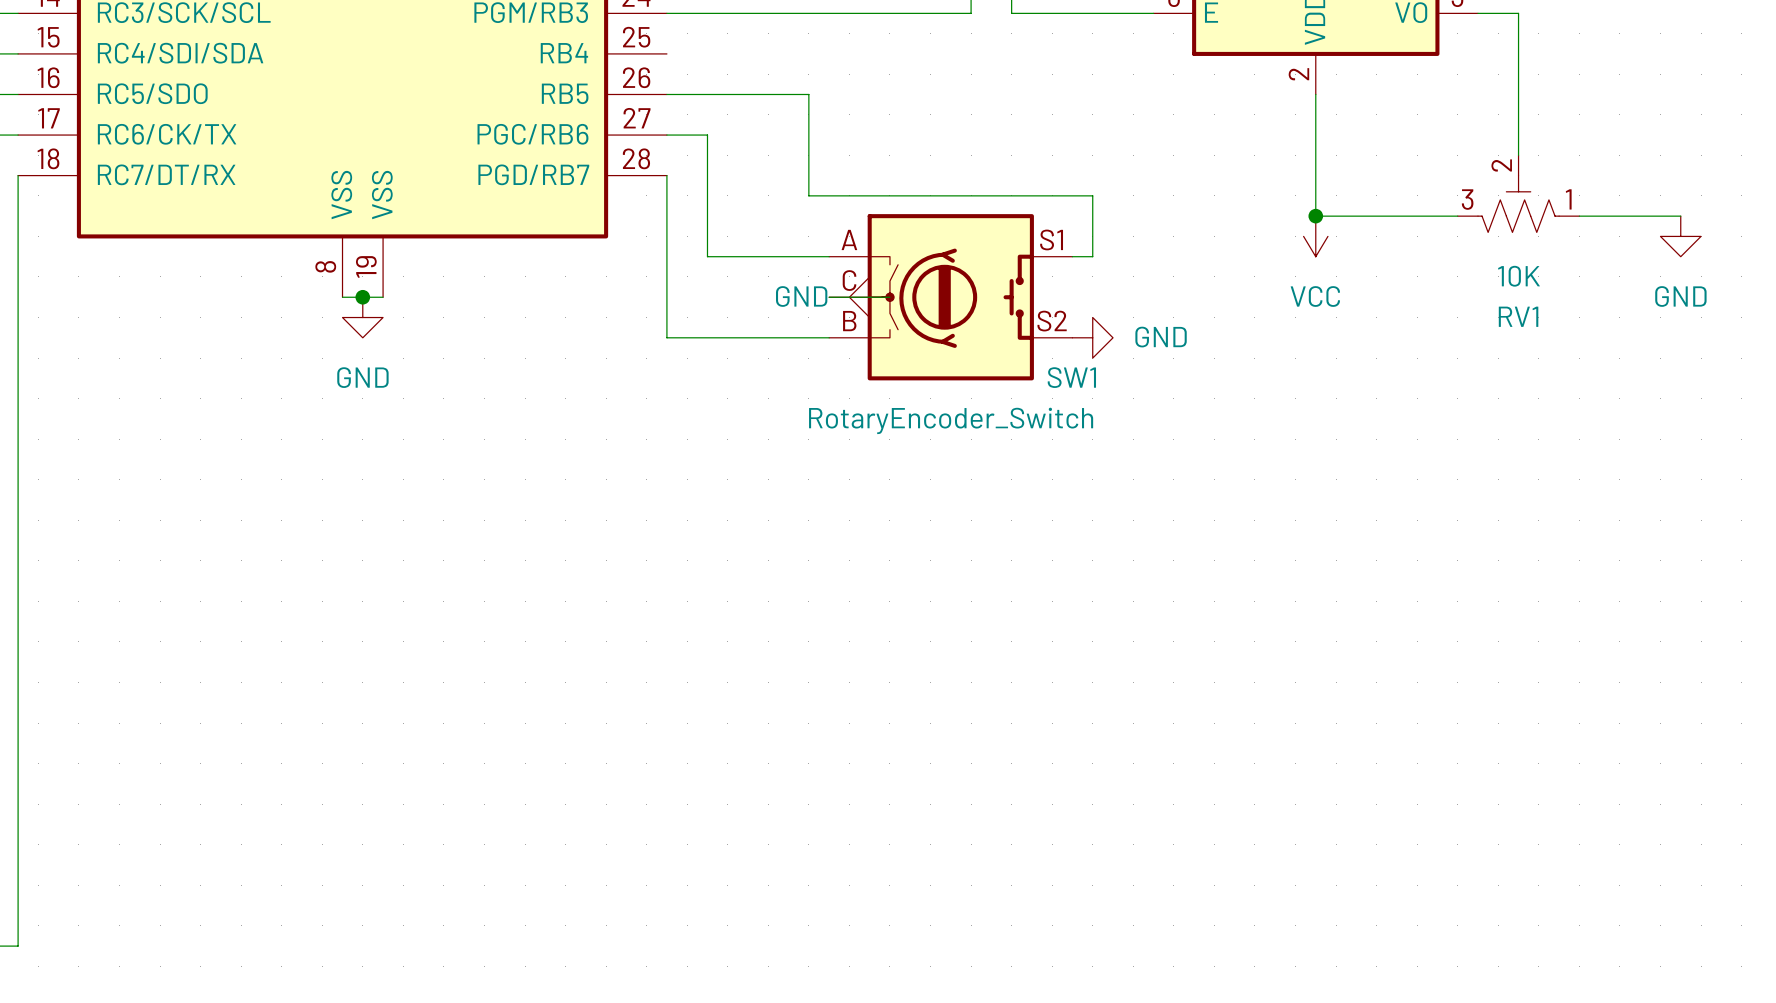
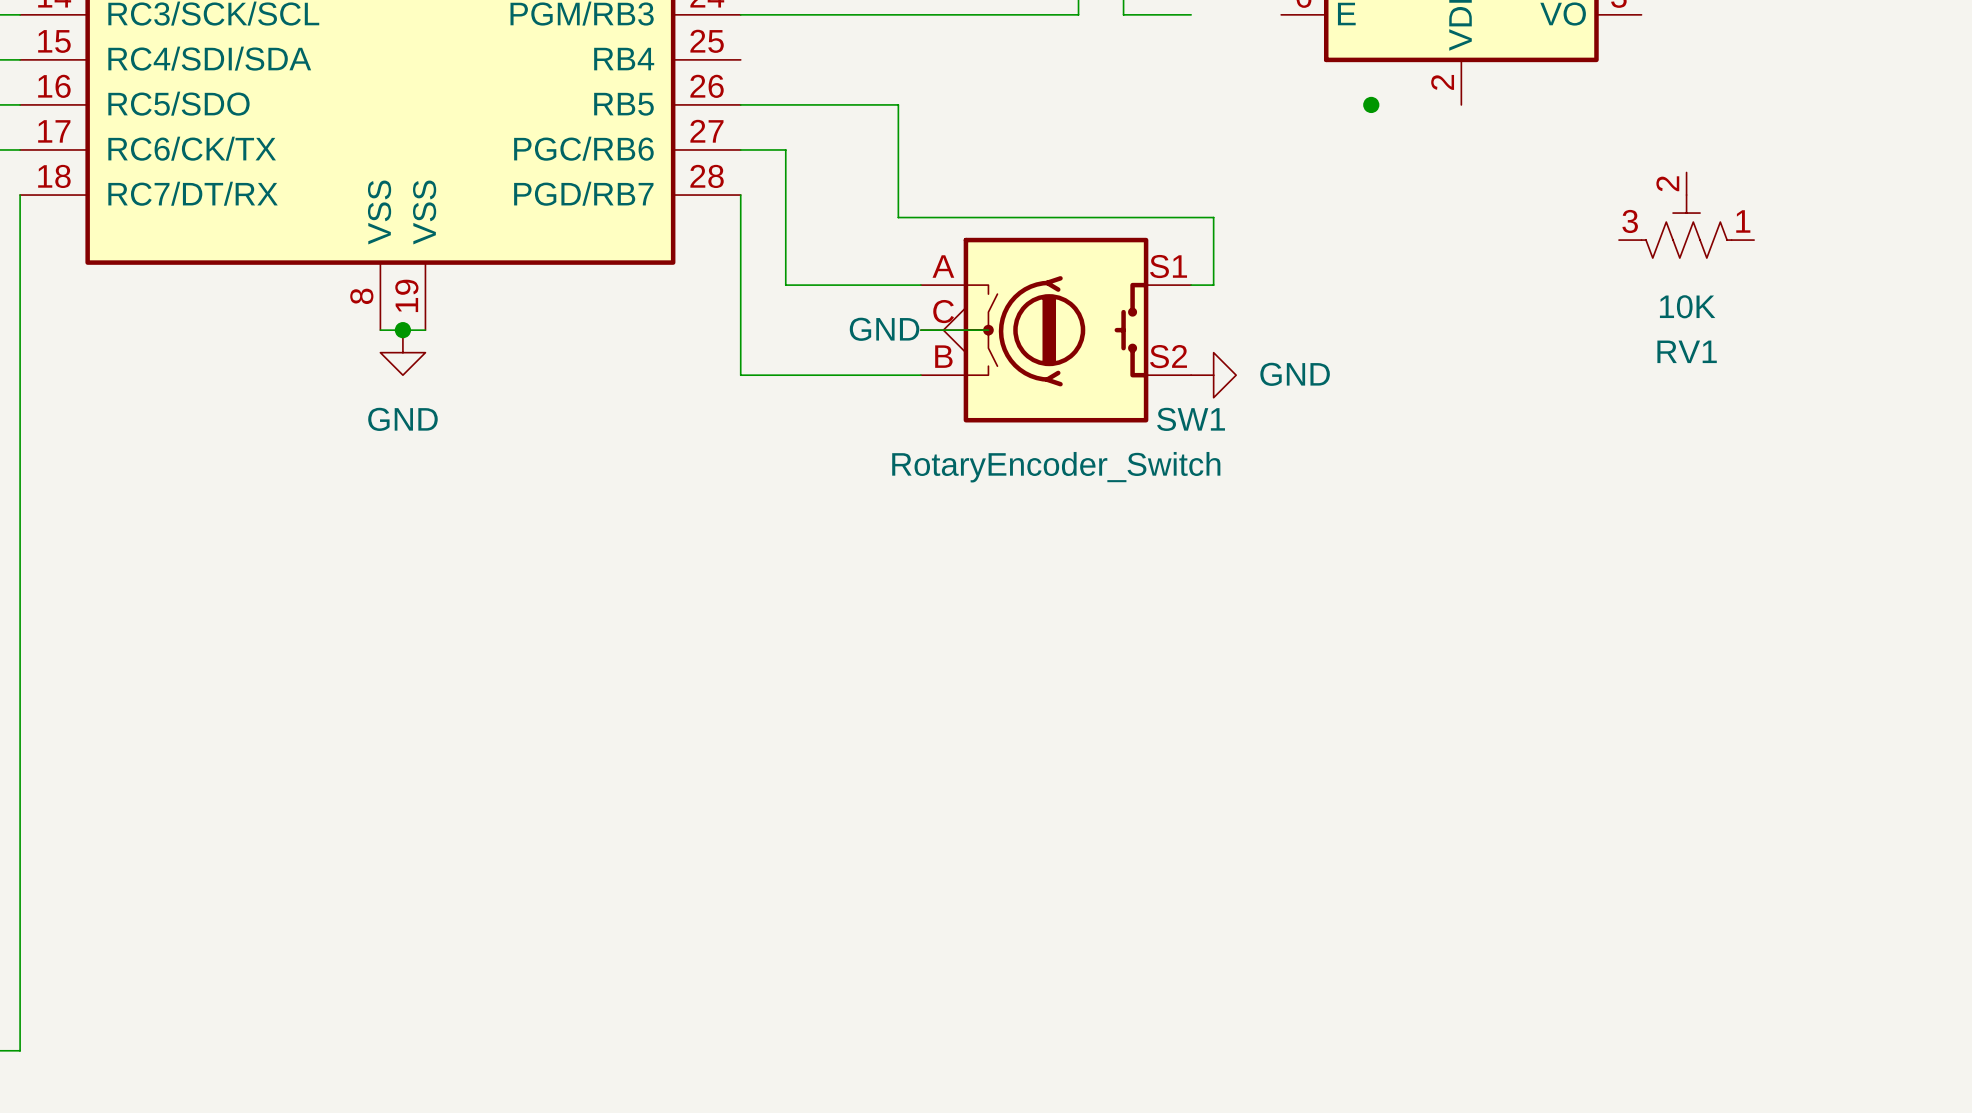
wire: (1072, 13) (1153, 13) -> none
wire: (1477, 13) (1518, 13) (1518, 155) -> none
junction: none -> (1371, 104)
wire: (1315, 94) (1315, 216) (1457, 216) -> none
junction: (1315, 216) -> none
wire: (1579, 216) (1680, 216) -> none
power symbol: VCC (1315, 236) -> none
power symbol: GND (1680, 236) -> none

